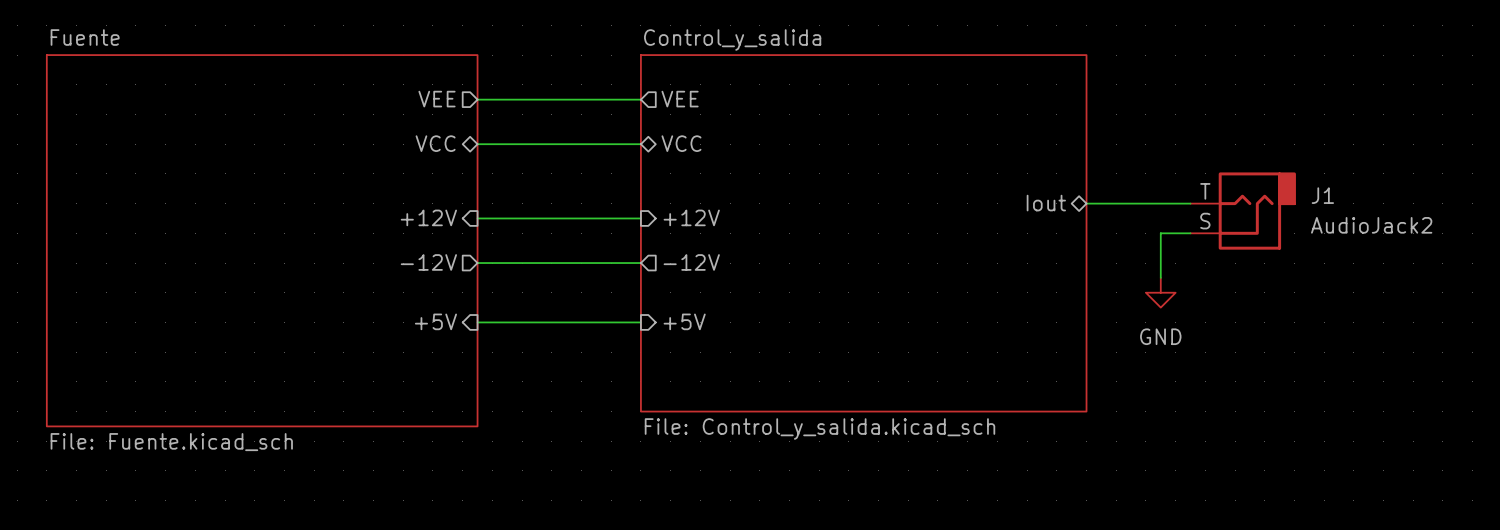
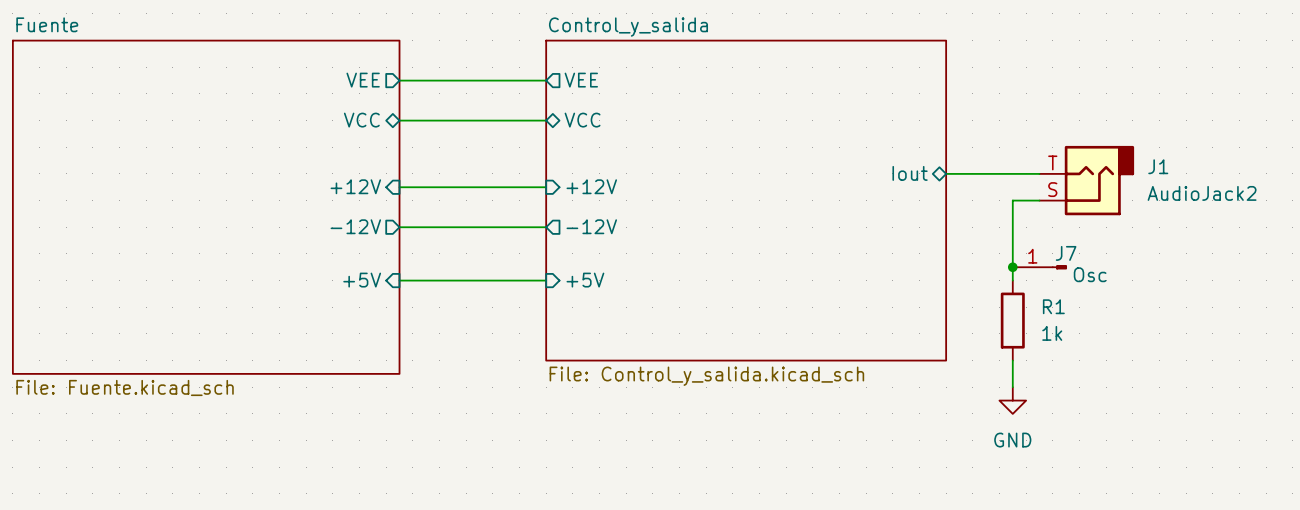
wire: none -> (1012, 240) (1012, 280)
power symbol position: GND (1160, 292) -> GND (1012, 400)
junction: none -> (1012, 267)
J7: none -> Osc (1039, 267)
R1: none -> 1k (1012, 320)
wire: none -> (1012, 360) (1012, 387)

